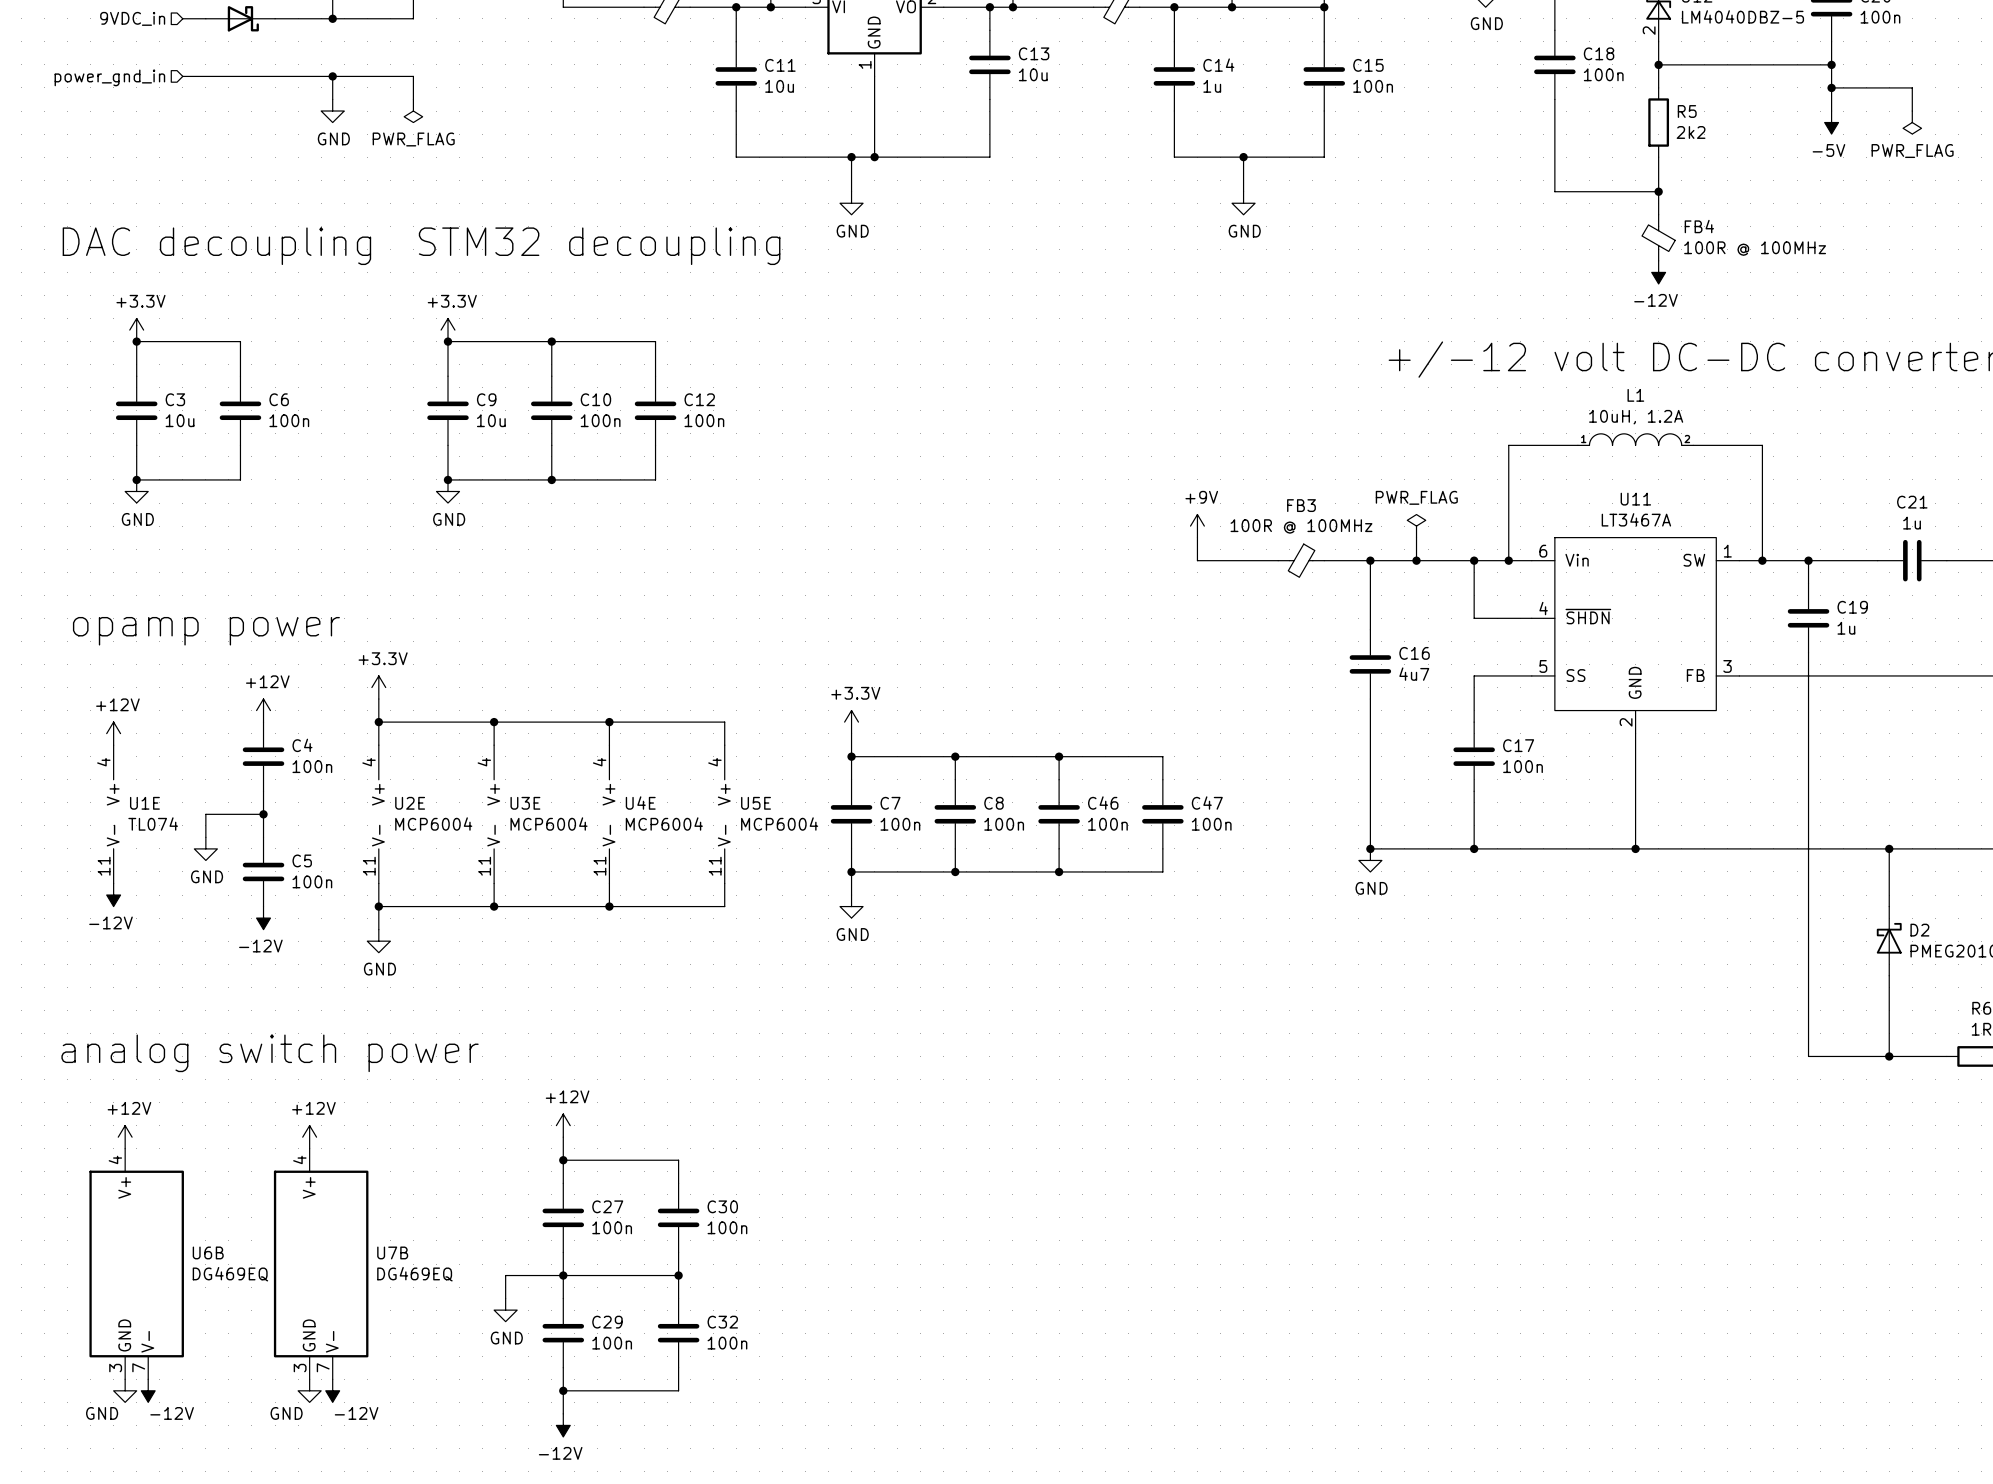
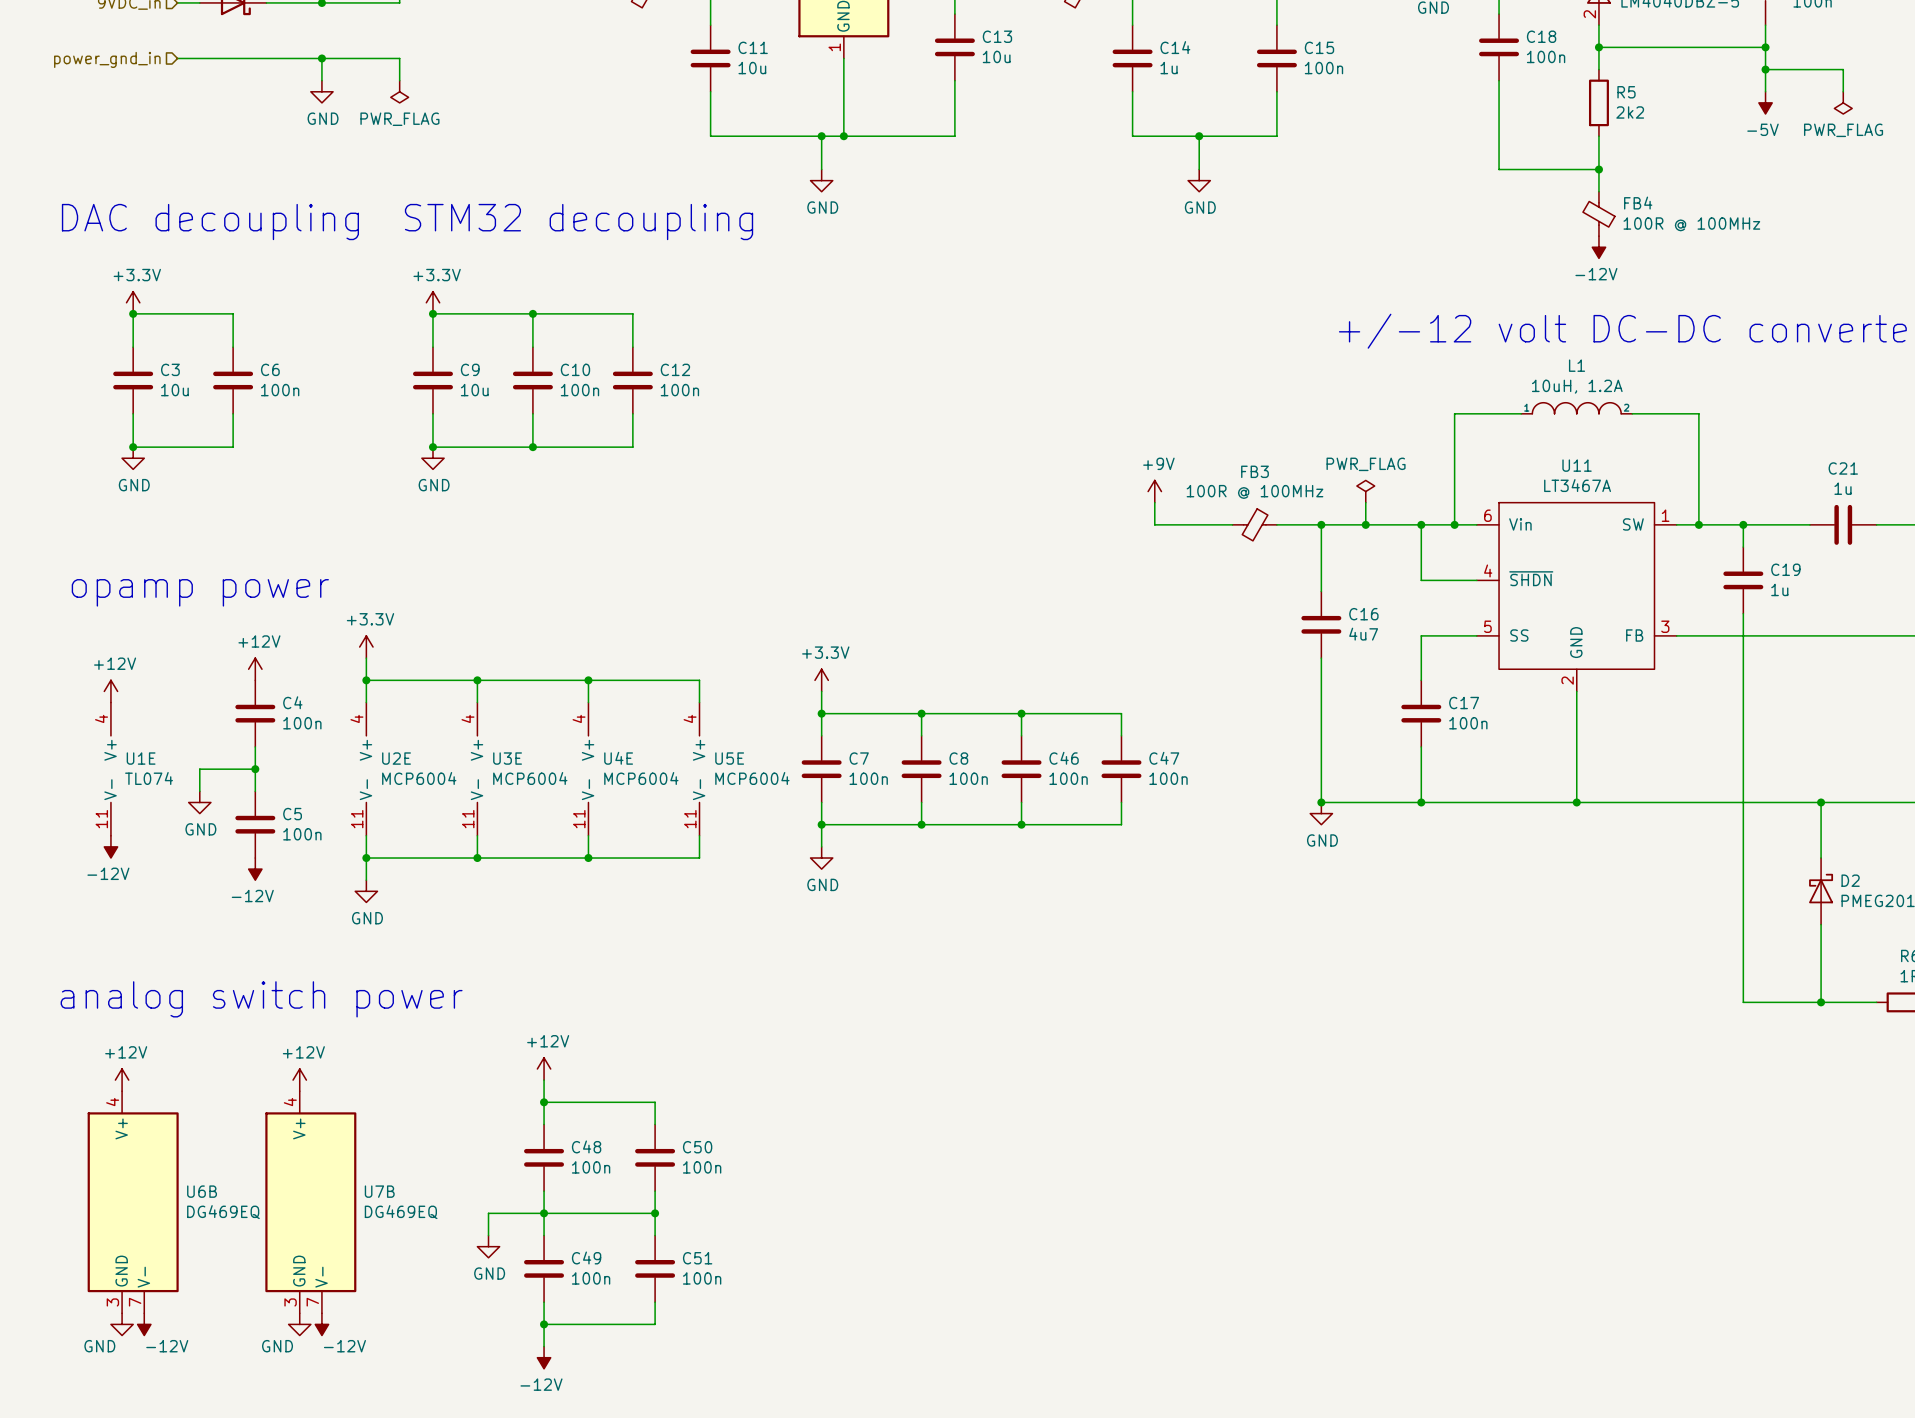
C27 name: C27 (607, 1206) -> C48 (586, 1146)
C30 name: C30 (722, 1206) -> C50 (697, 1147)
C29 name: C29 (607, 1322) -> C49 (586, 1257)
C32 name: C32 (722, 1322) -> C51 (697, 1258)

